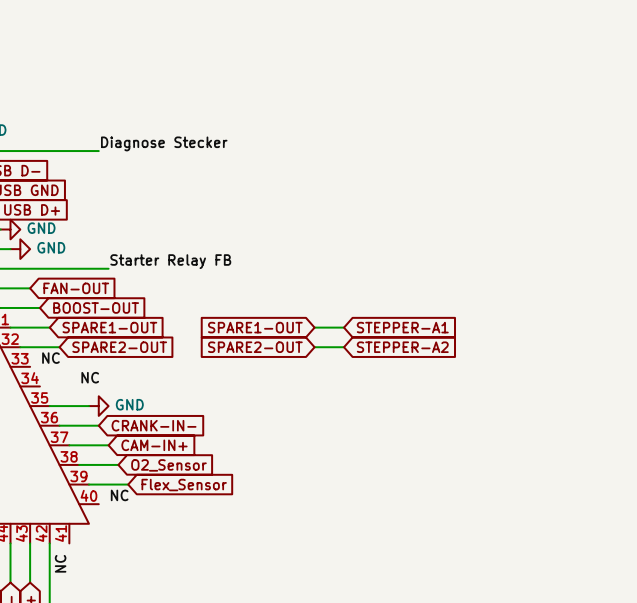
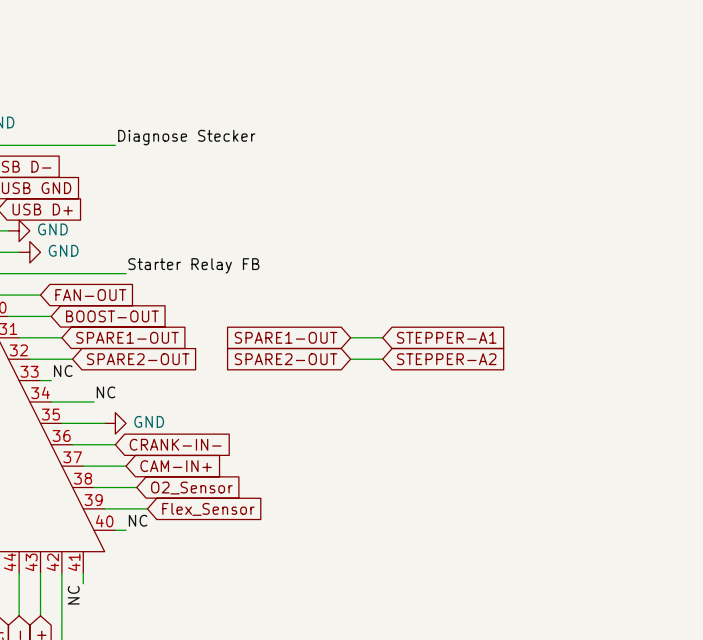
wire: none -> (40, 380) (51, 380)
wire: none -> (51, 401) (93, 401)
wire: none -> (115, 530) (126, 530)
wire: none -> (83, 573) (83, 583)

